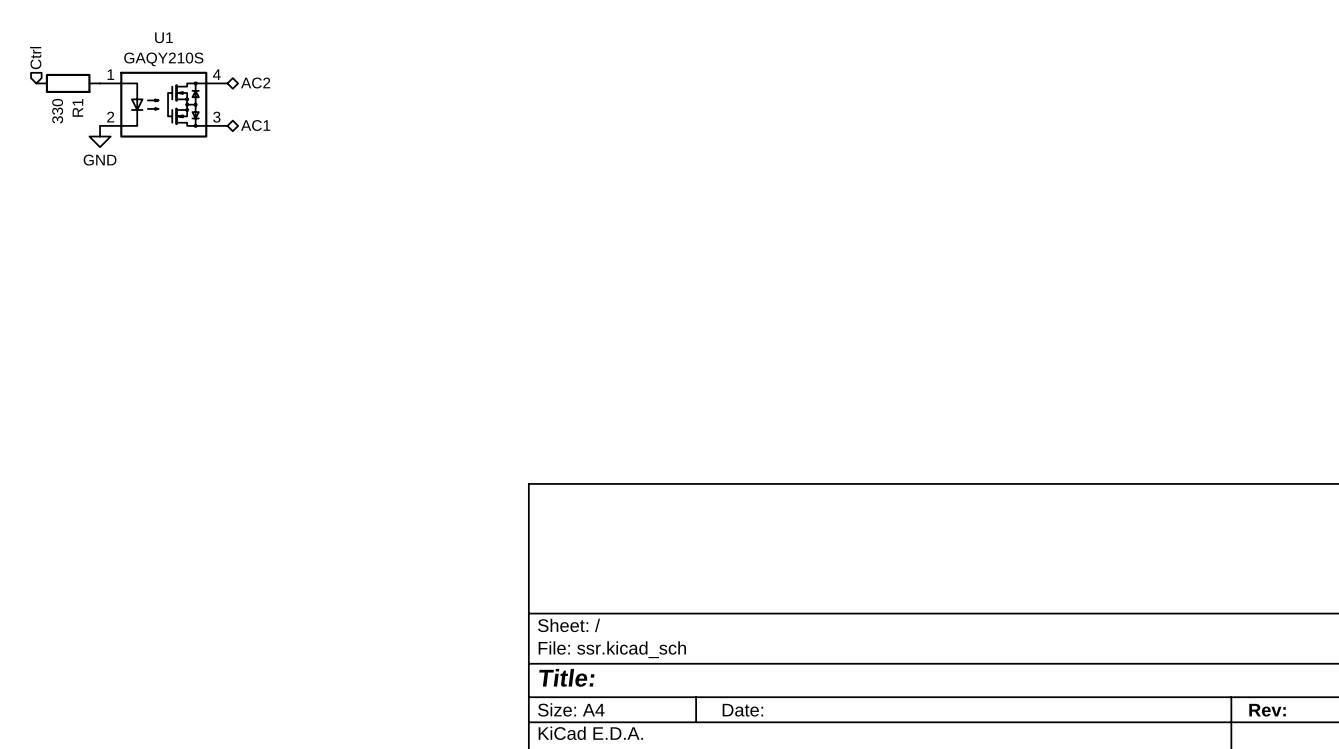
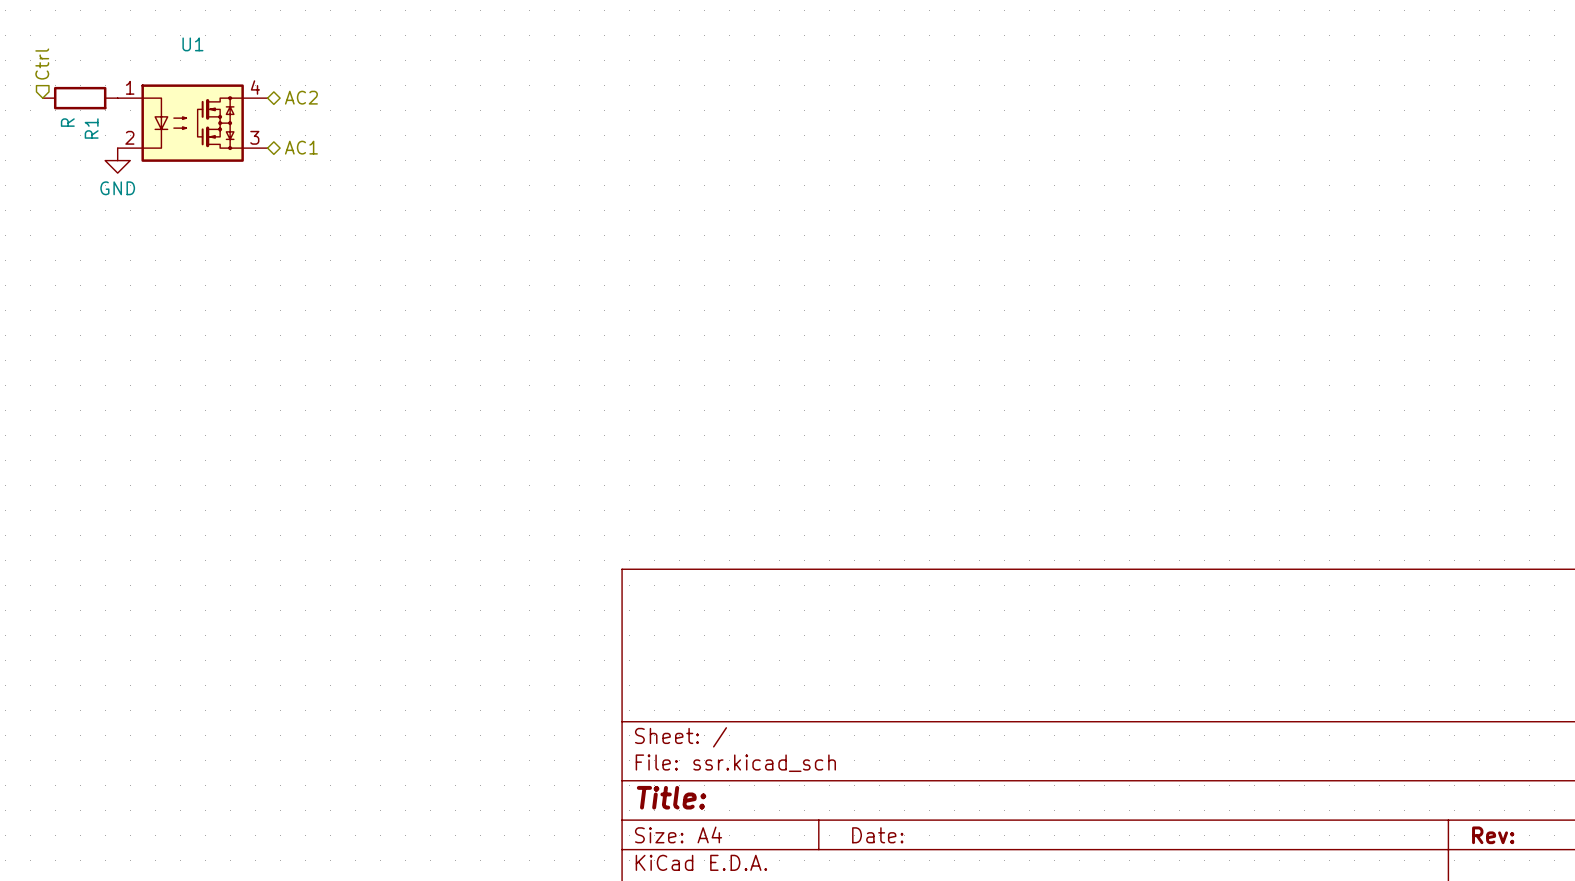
U1 value: GAQY210S (163, 59) -> none
R1 value: 330 (57, 111) -> R (67, 122)

